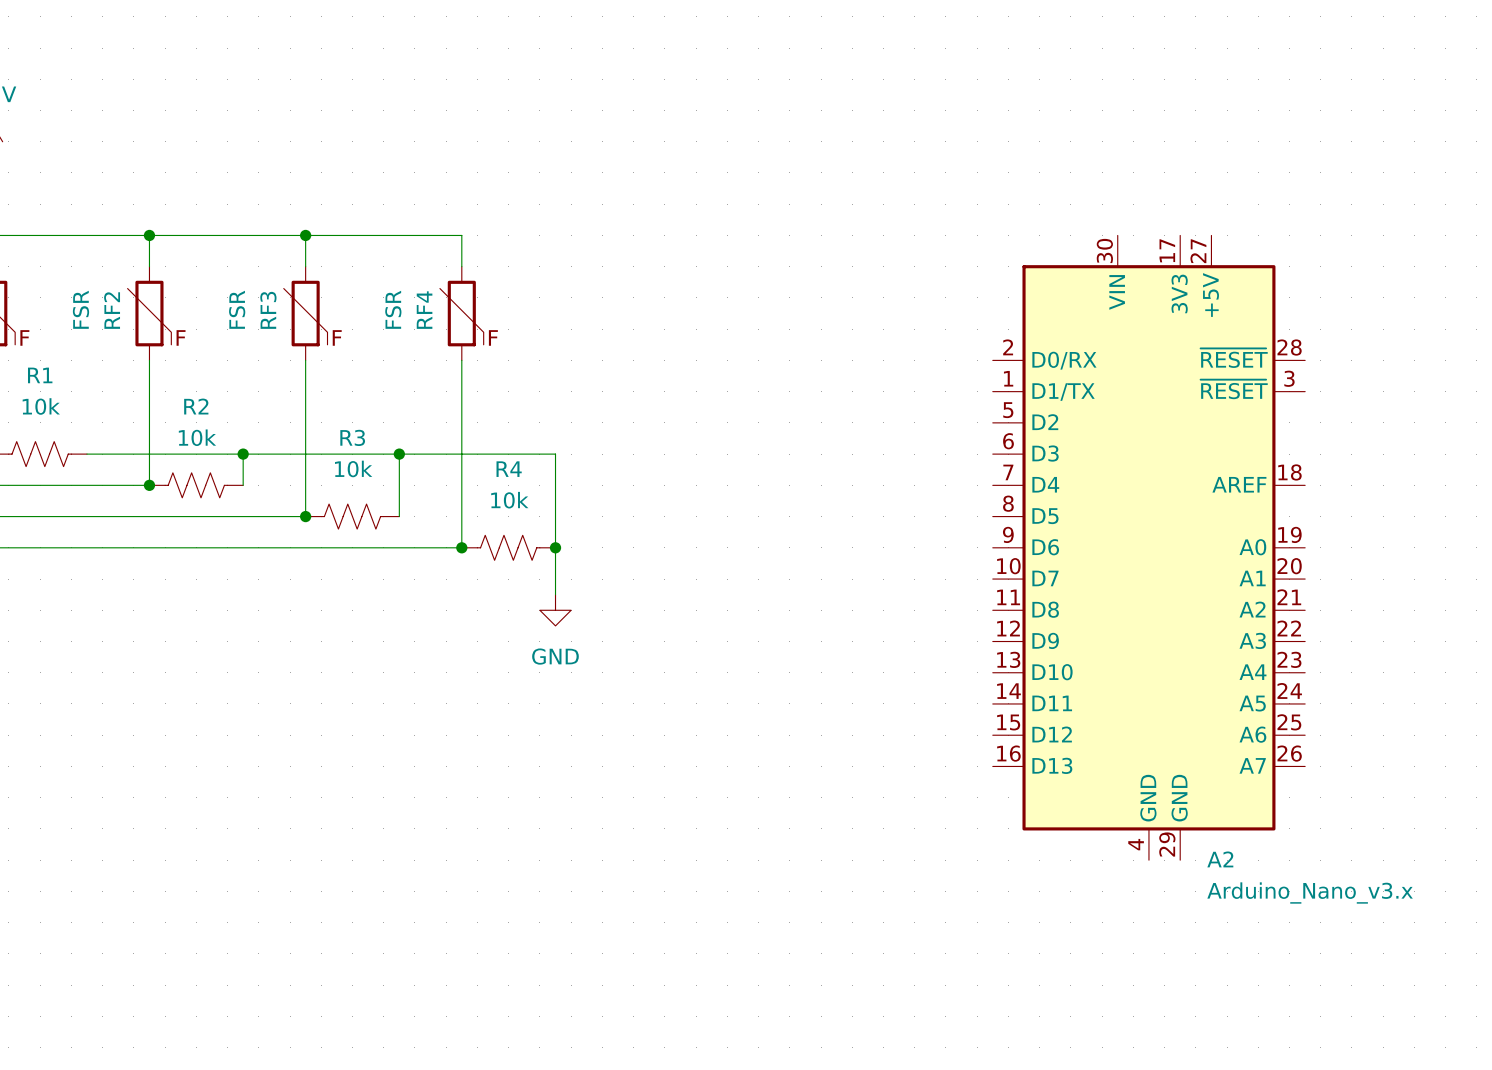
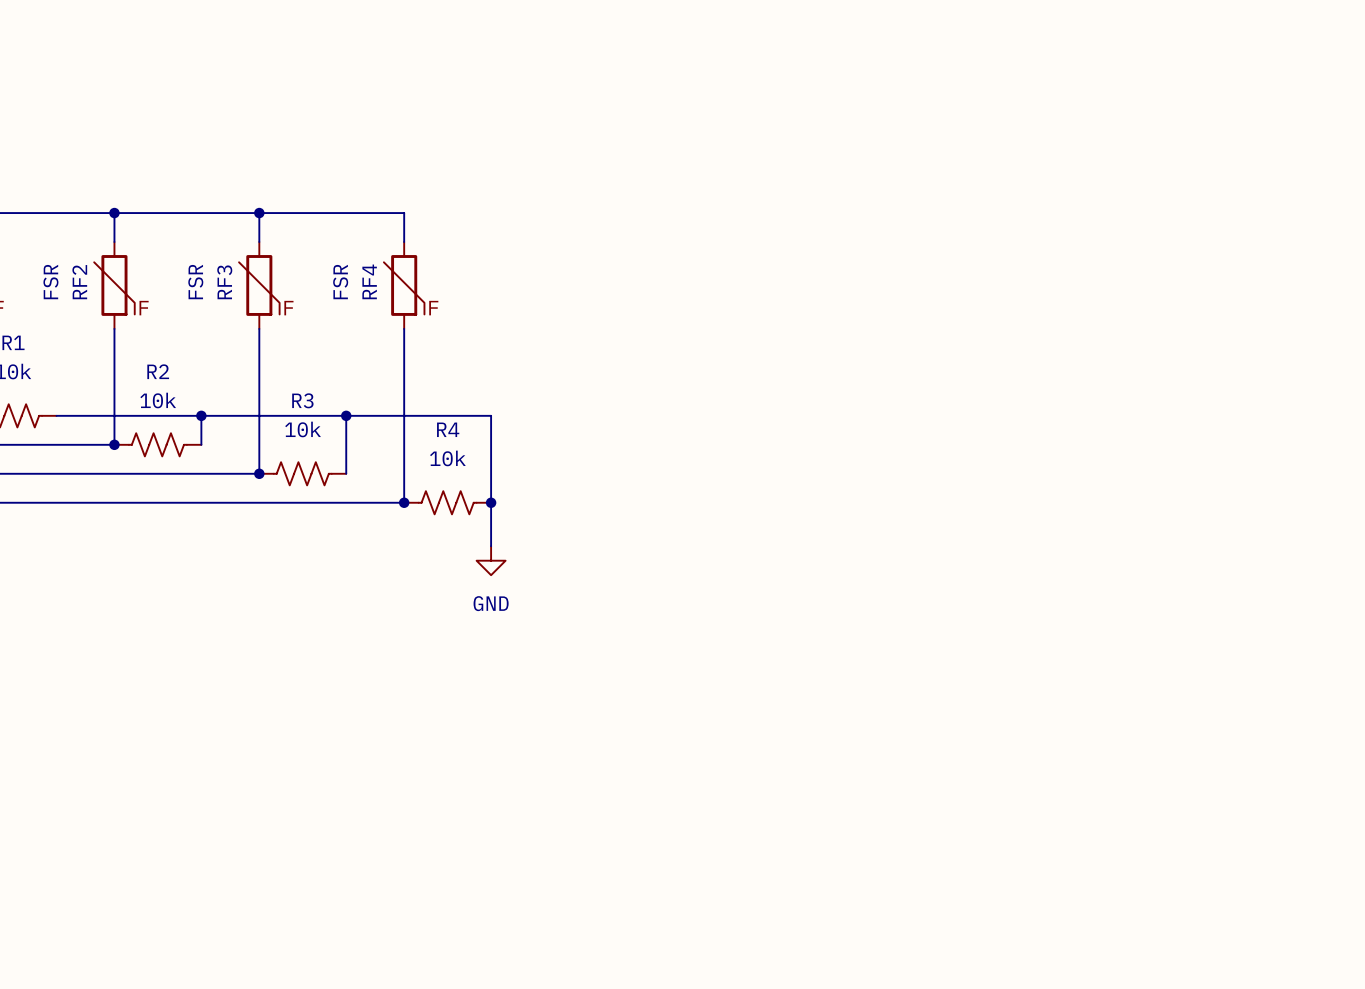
A2: Arduino_Nano_v3.x (1148, 547) -> none

